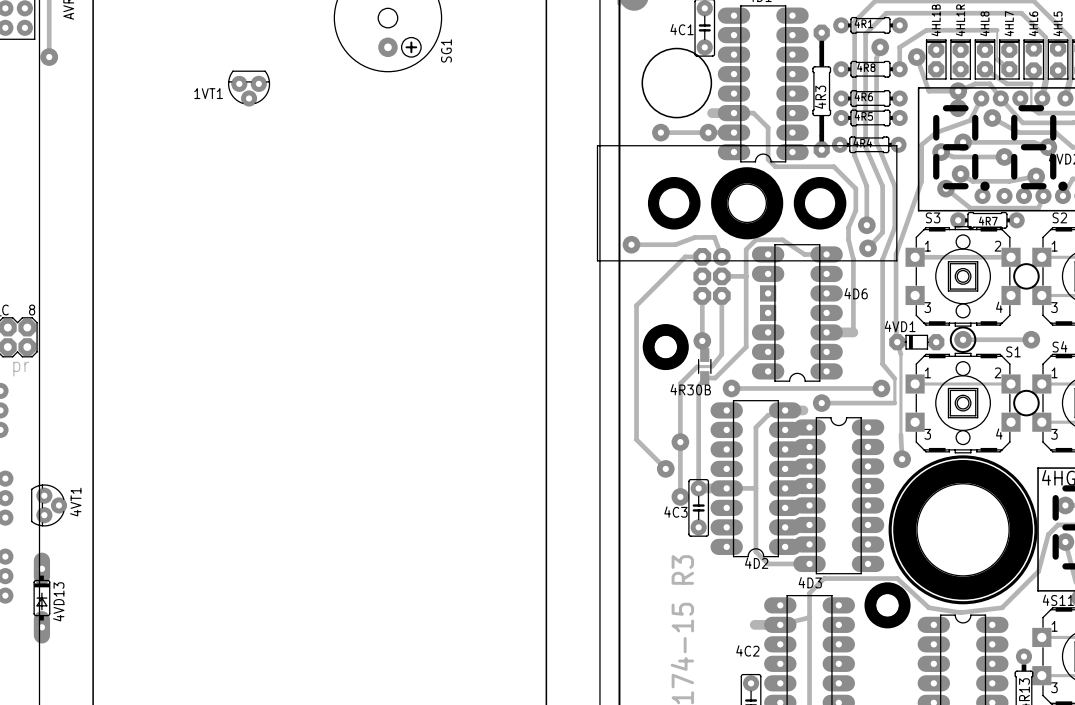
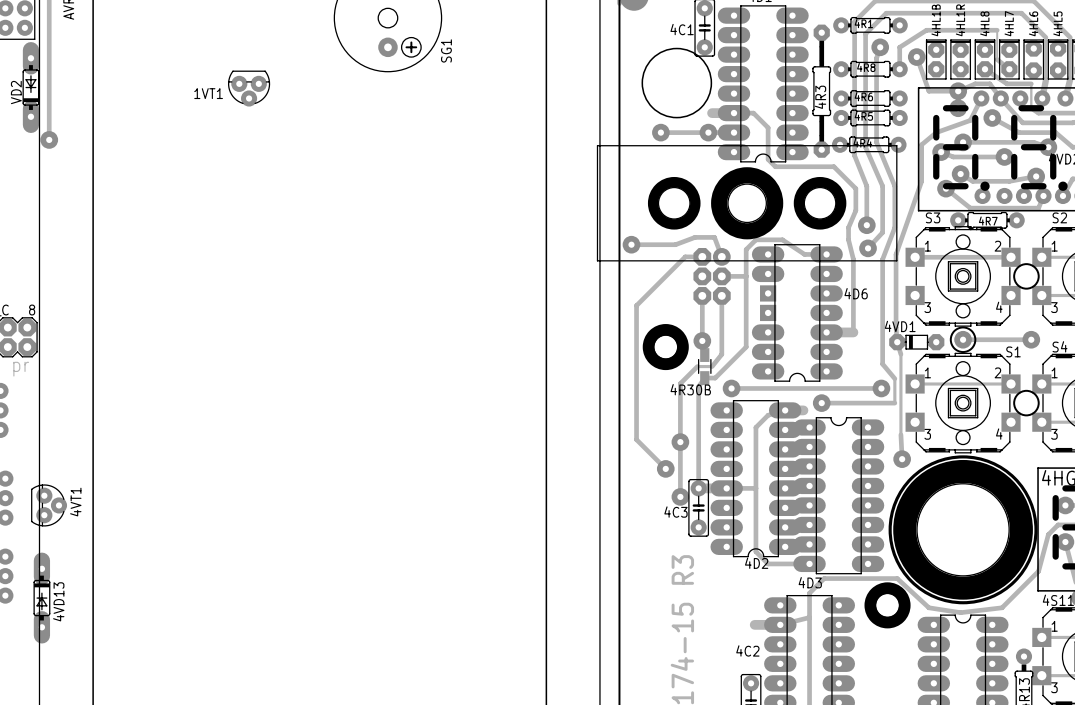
track: none -> (49, 57) (49, 139)
via: (49, 57) -> none
VD2: none -> (30, 87)
via: none -> (49, 139)

